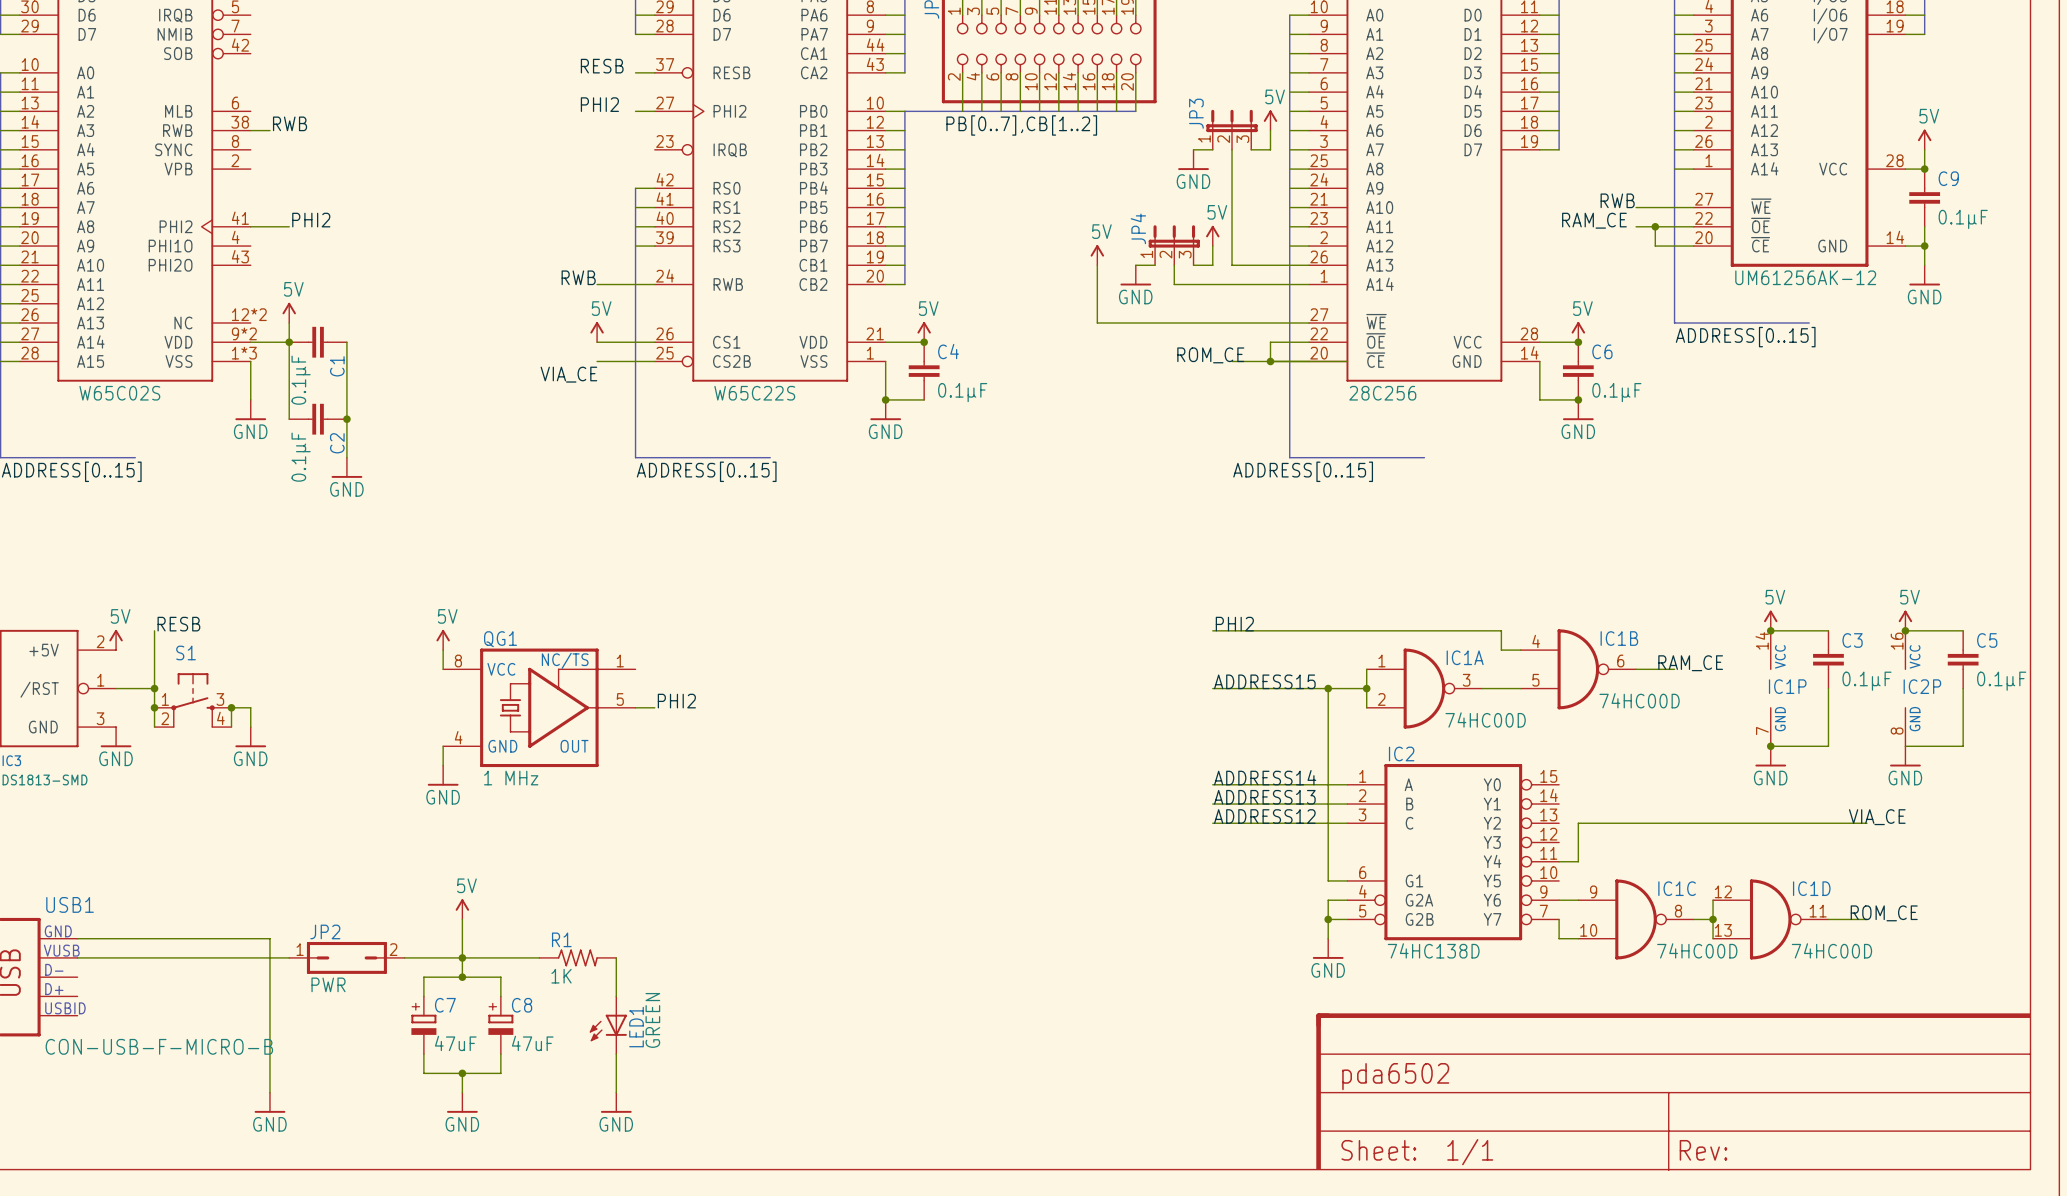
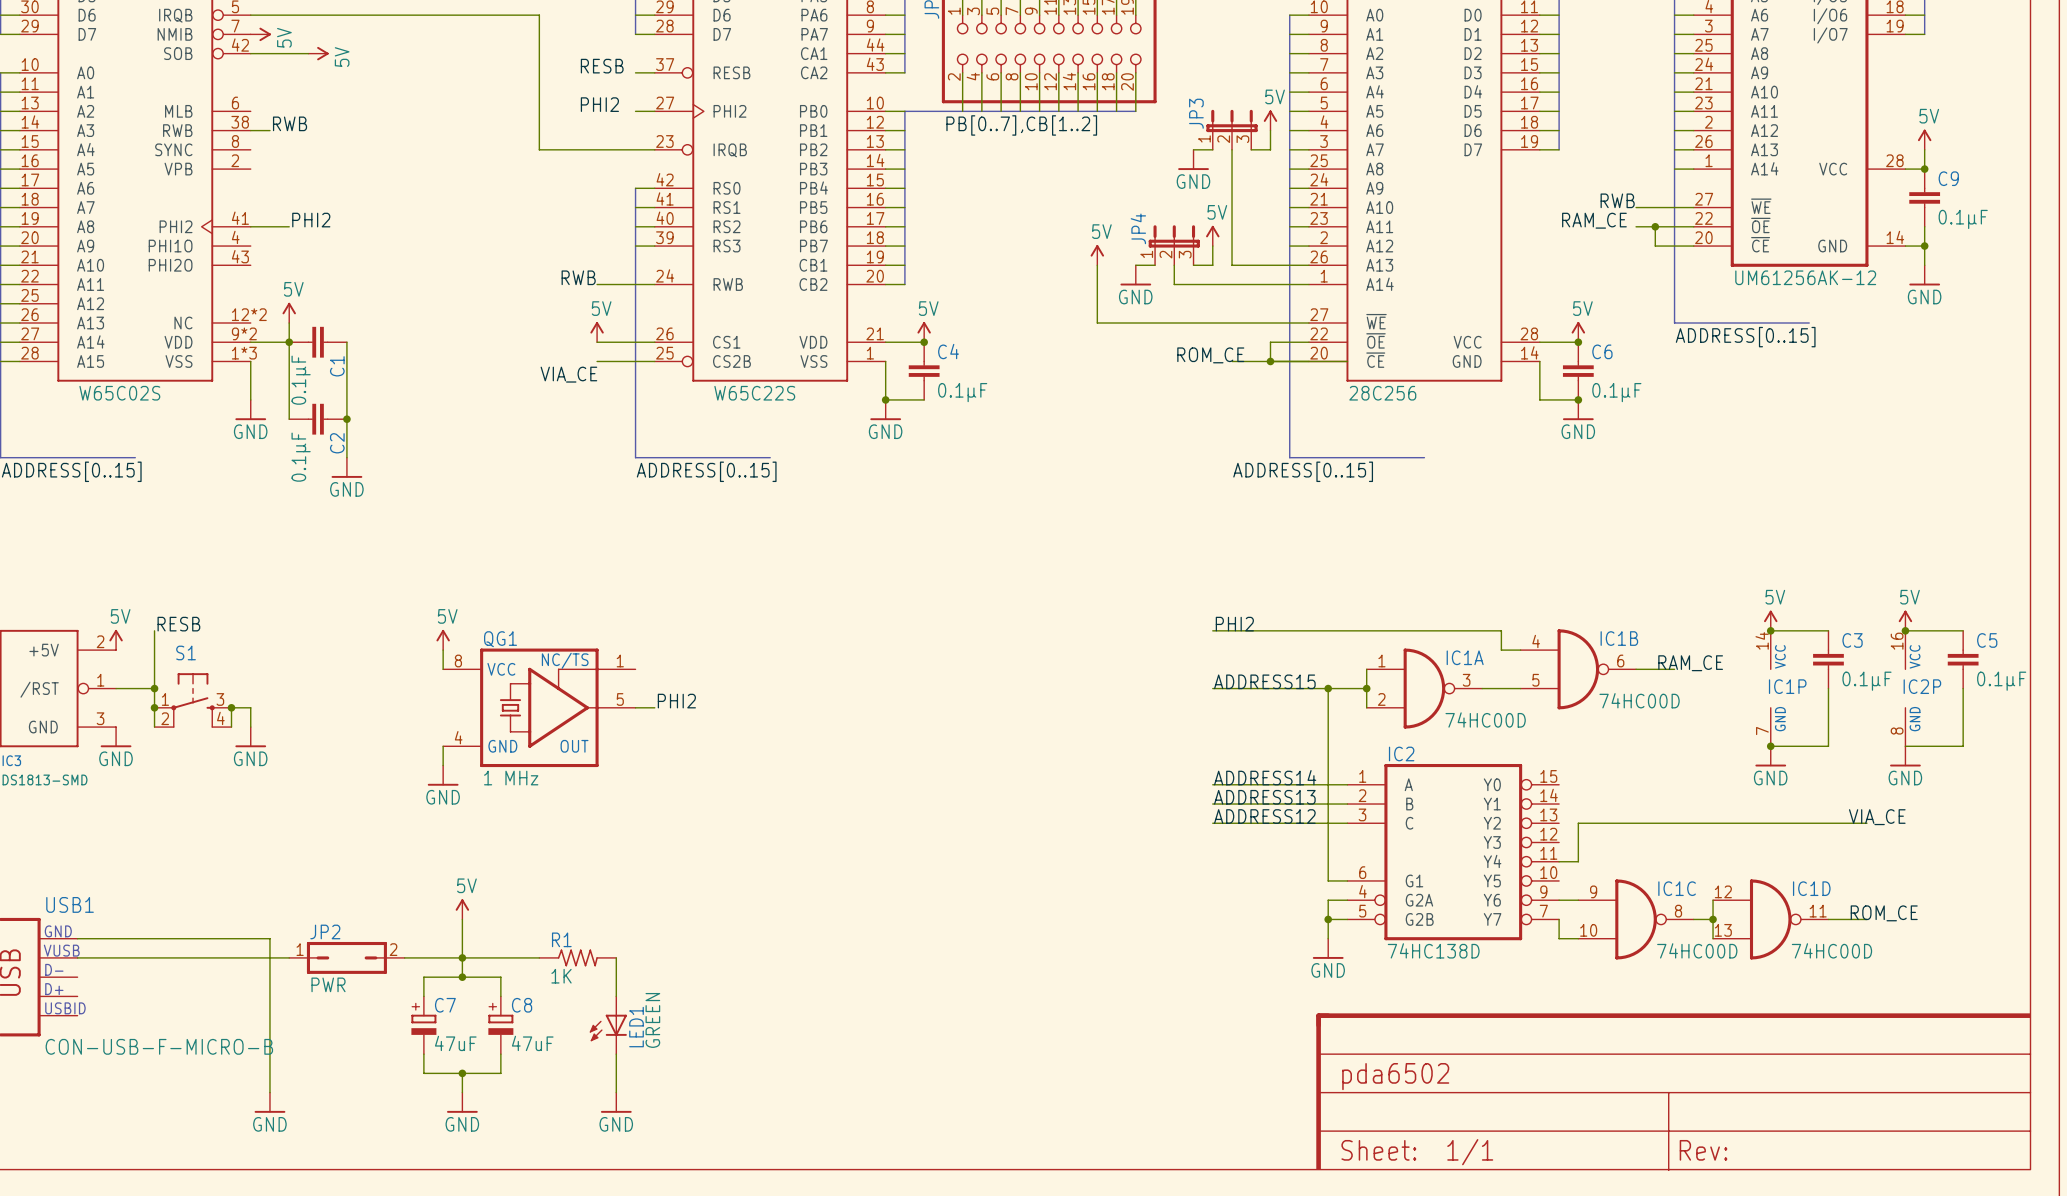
wire: none -> (250, 15) (539, 15) (539, 149) (654, 149)
power symbol: none -> 5V (260, 34)
wire: none -> (250, 53) (308, 53)
power symbol: none -> 5V (318, 53)

